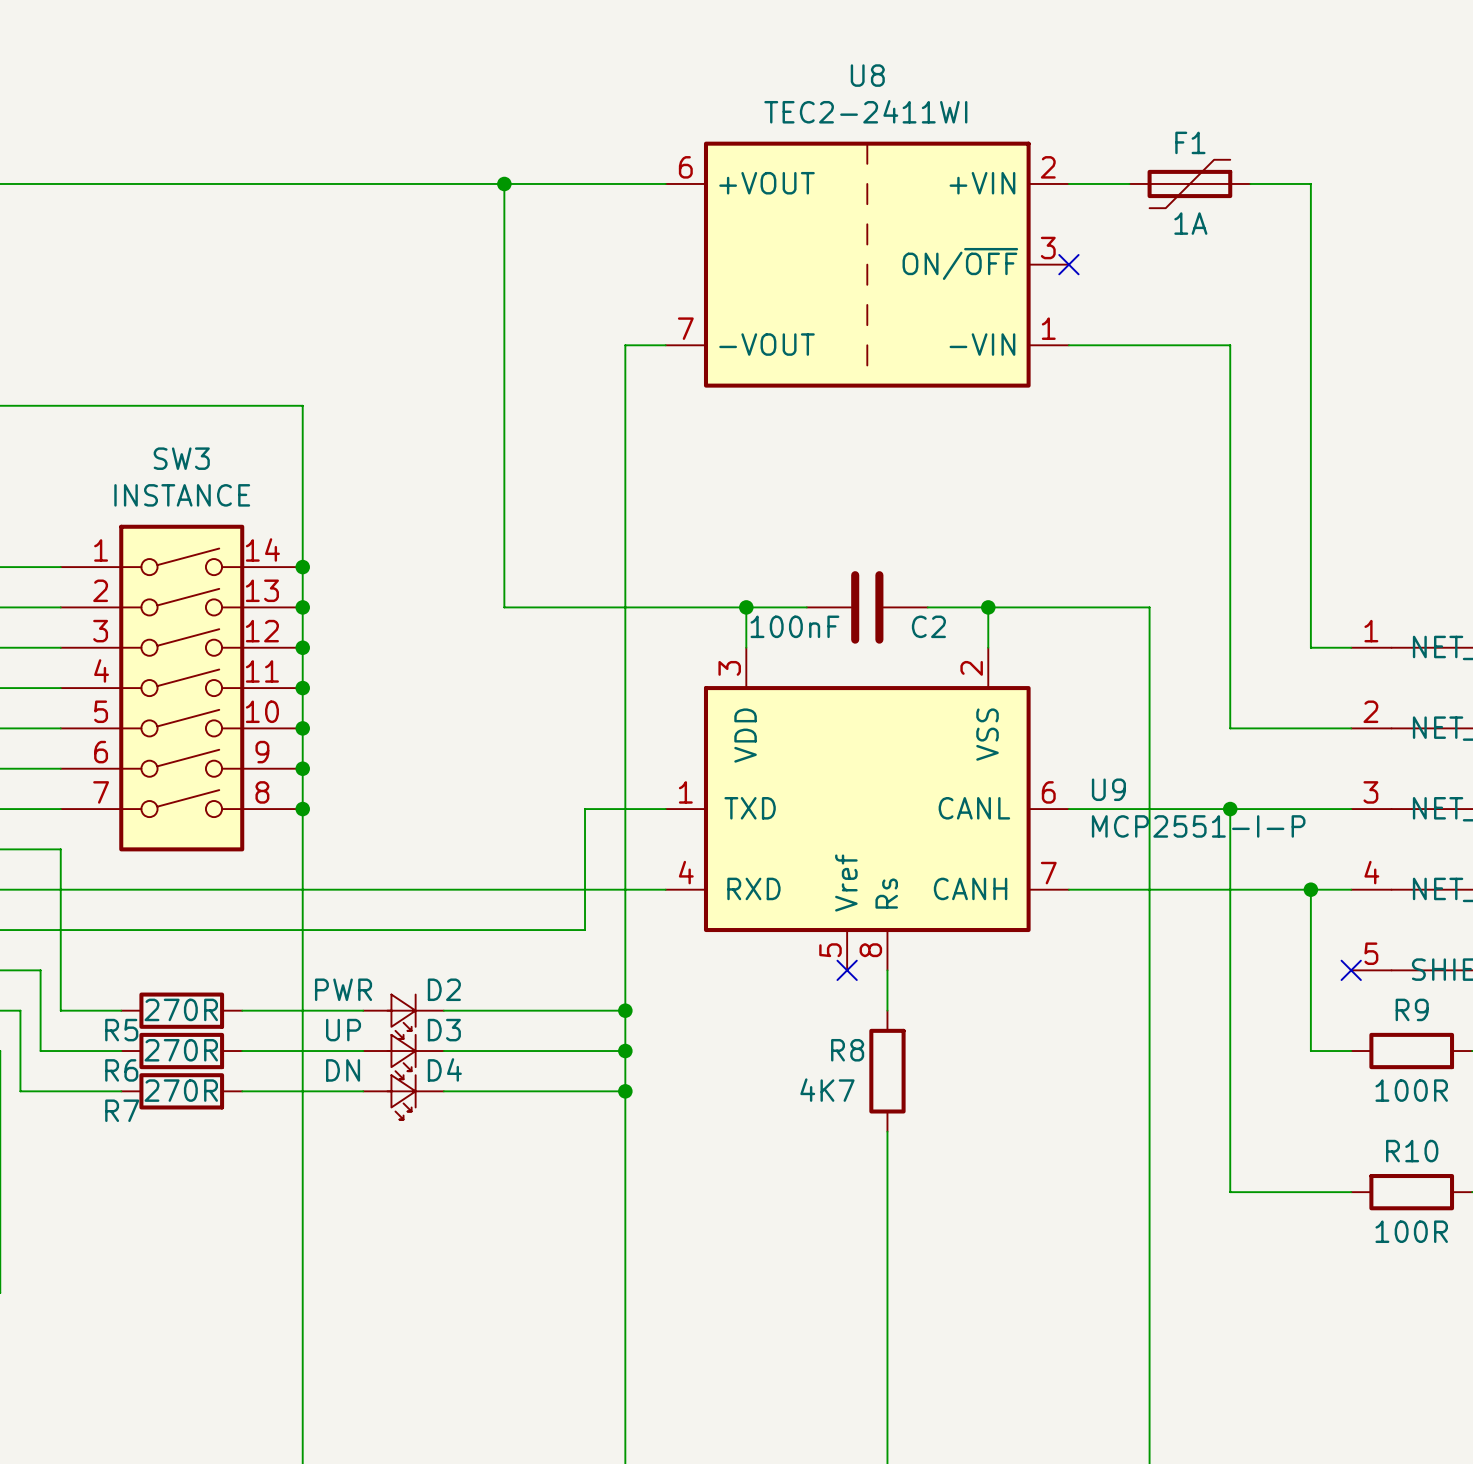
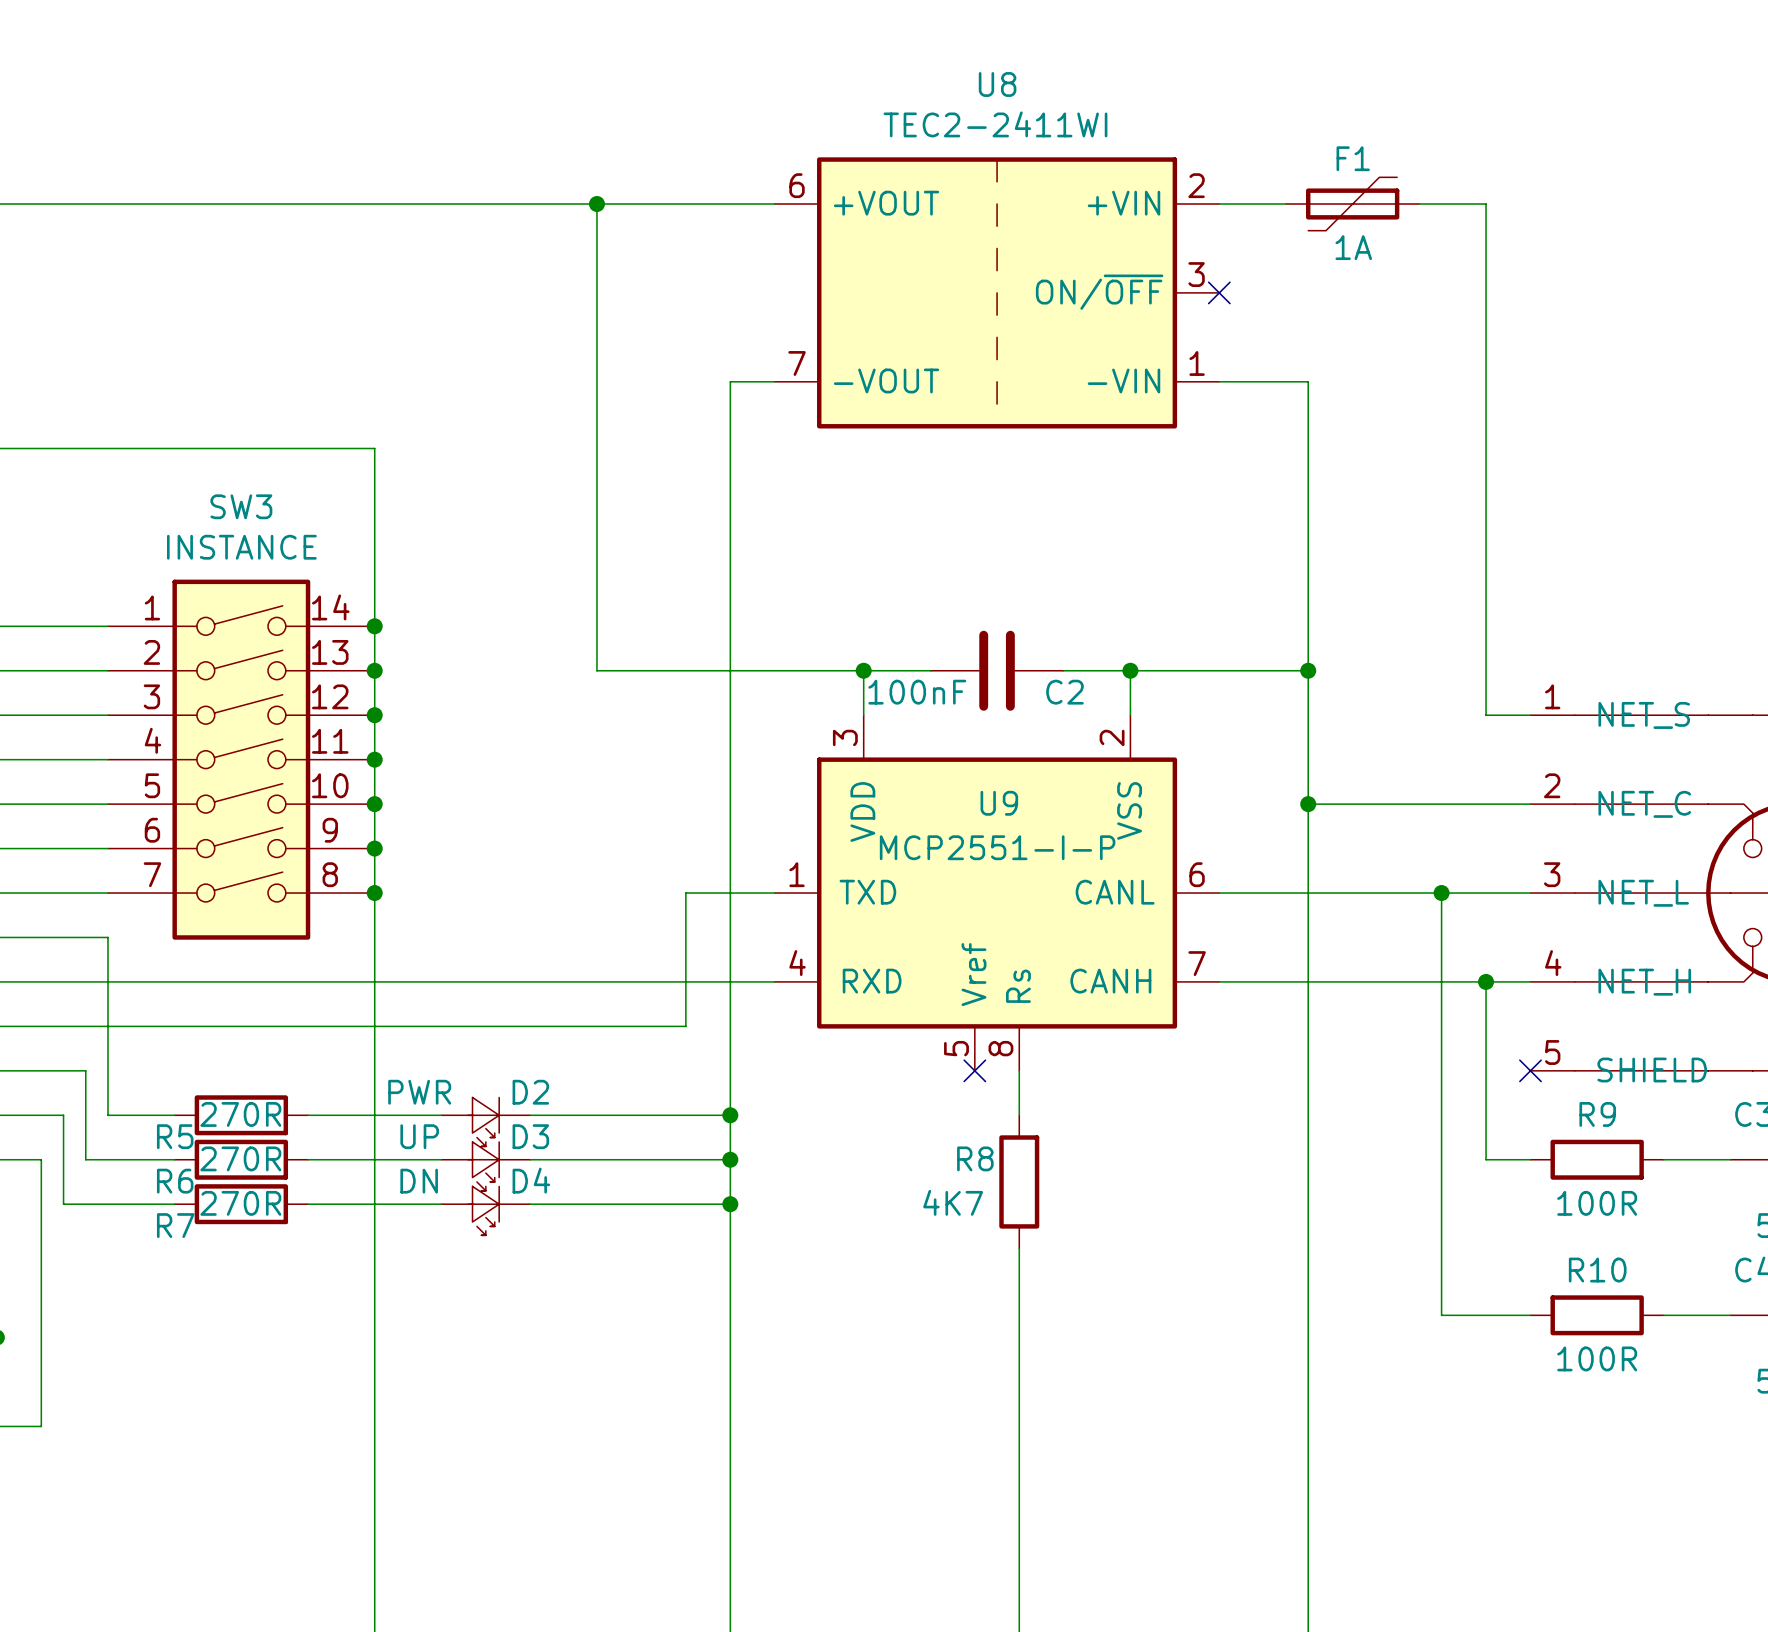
wire: (1149, 345) (1230, 345) (1230, 728) -> (1308, 381) (1308, 670)
junction: none -> (1308, 670)
wire: none -> (1308, 804) (1397, 804)
junction: none -> (1308, 804)
U9 name position: U9 (1108, 789) -> U9 (999, 803)
wire: (1230, 809) (1230, 1192) (1270, 1192) -> (1441, 893) (1441, 1315)
junction position: (1230, 809) -> (1441, 893)
U9 value position: MCP2551-I-P (1198, 826) -> MCP2551-I-P (997, 847)

